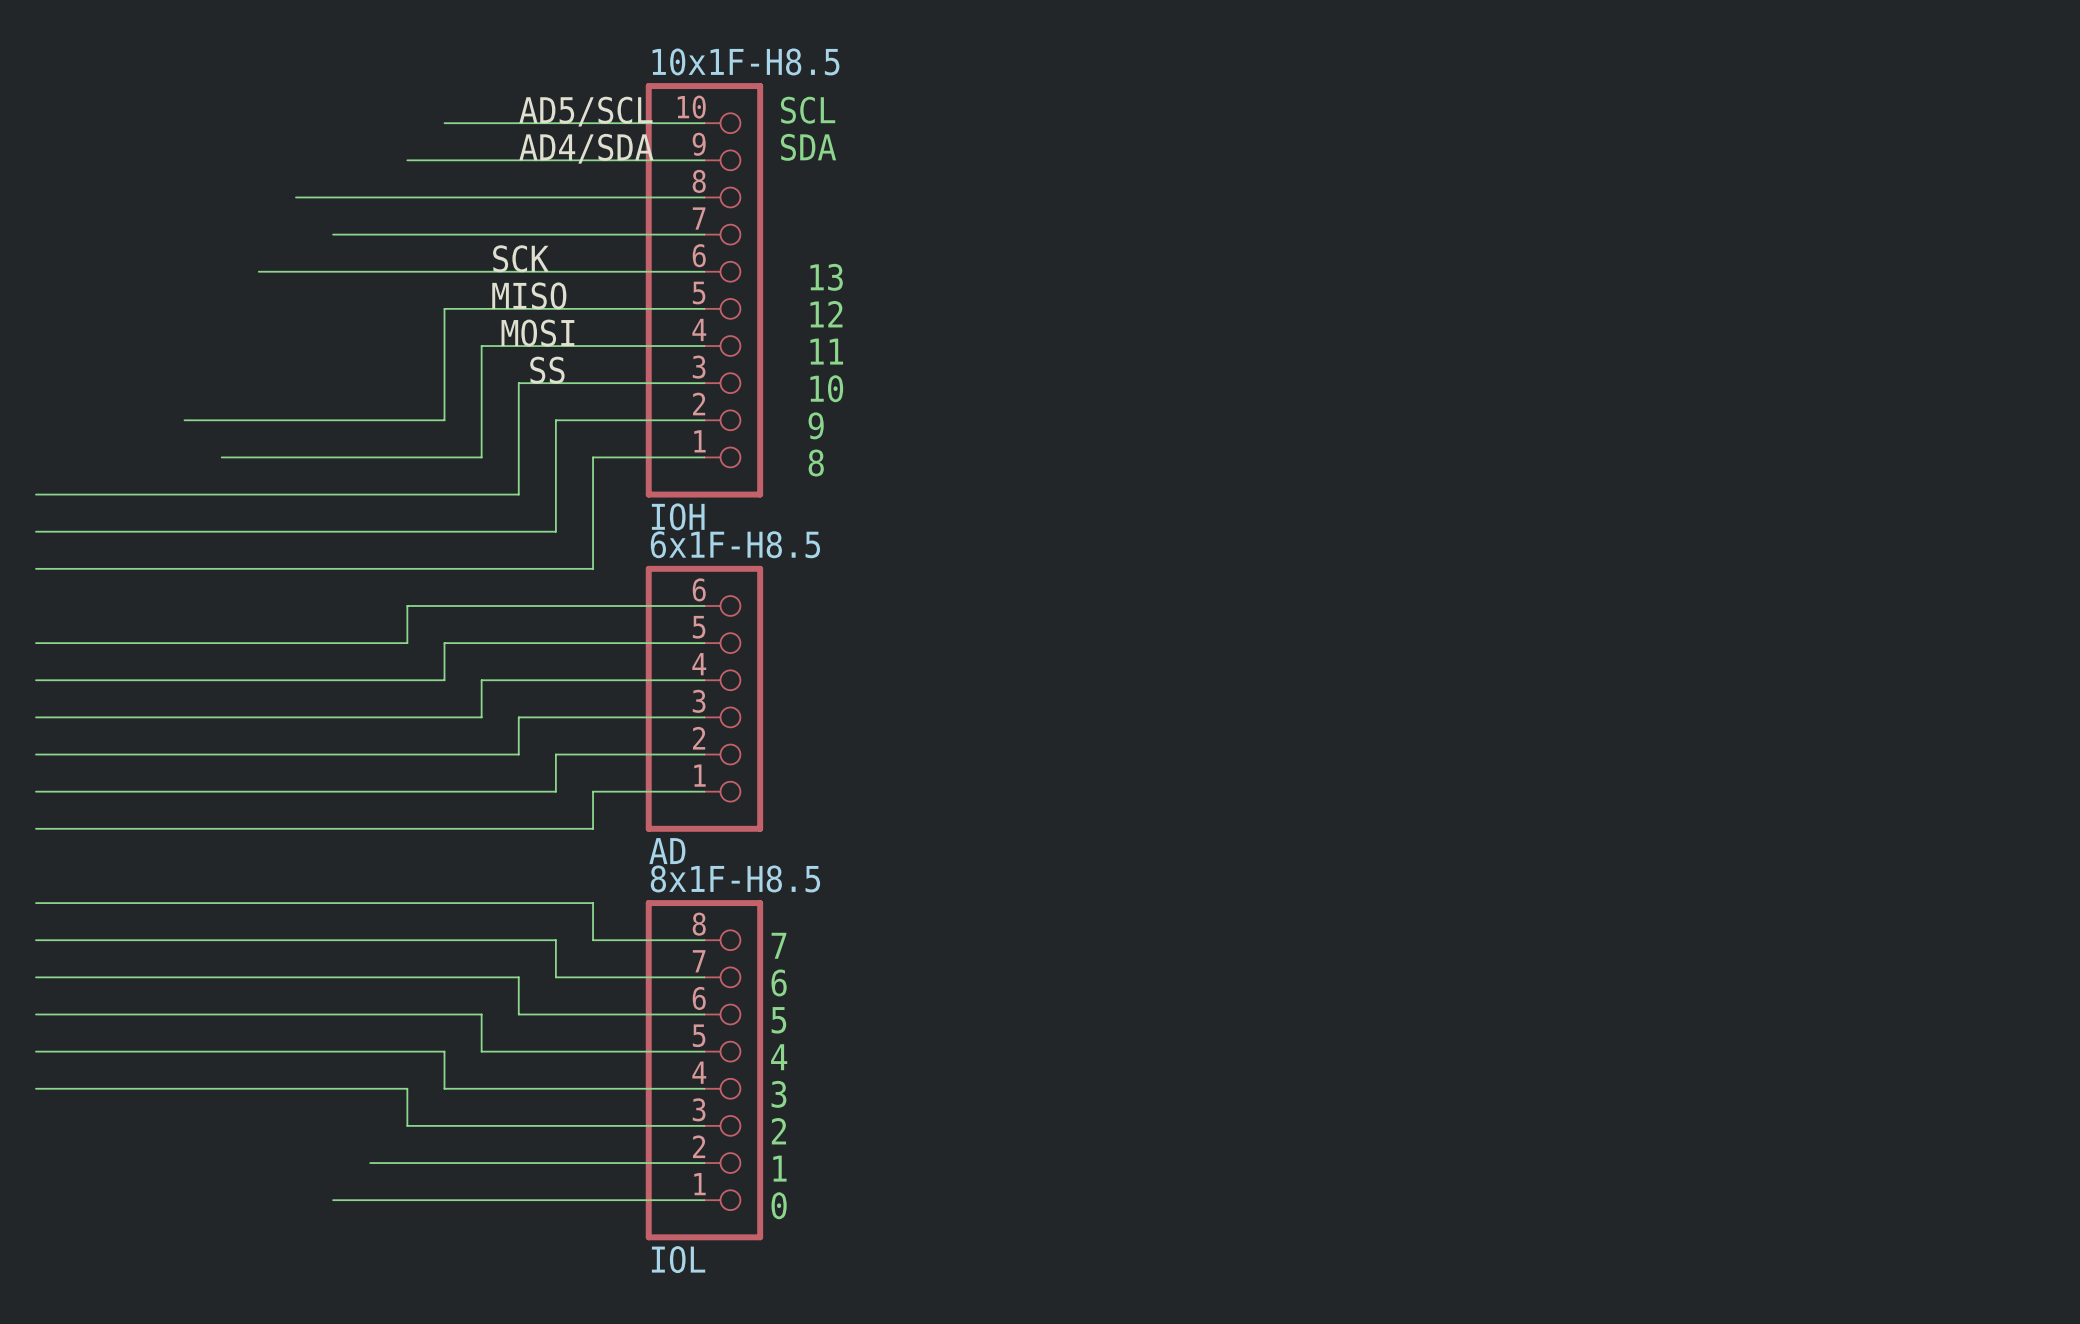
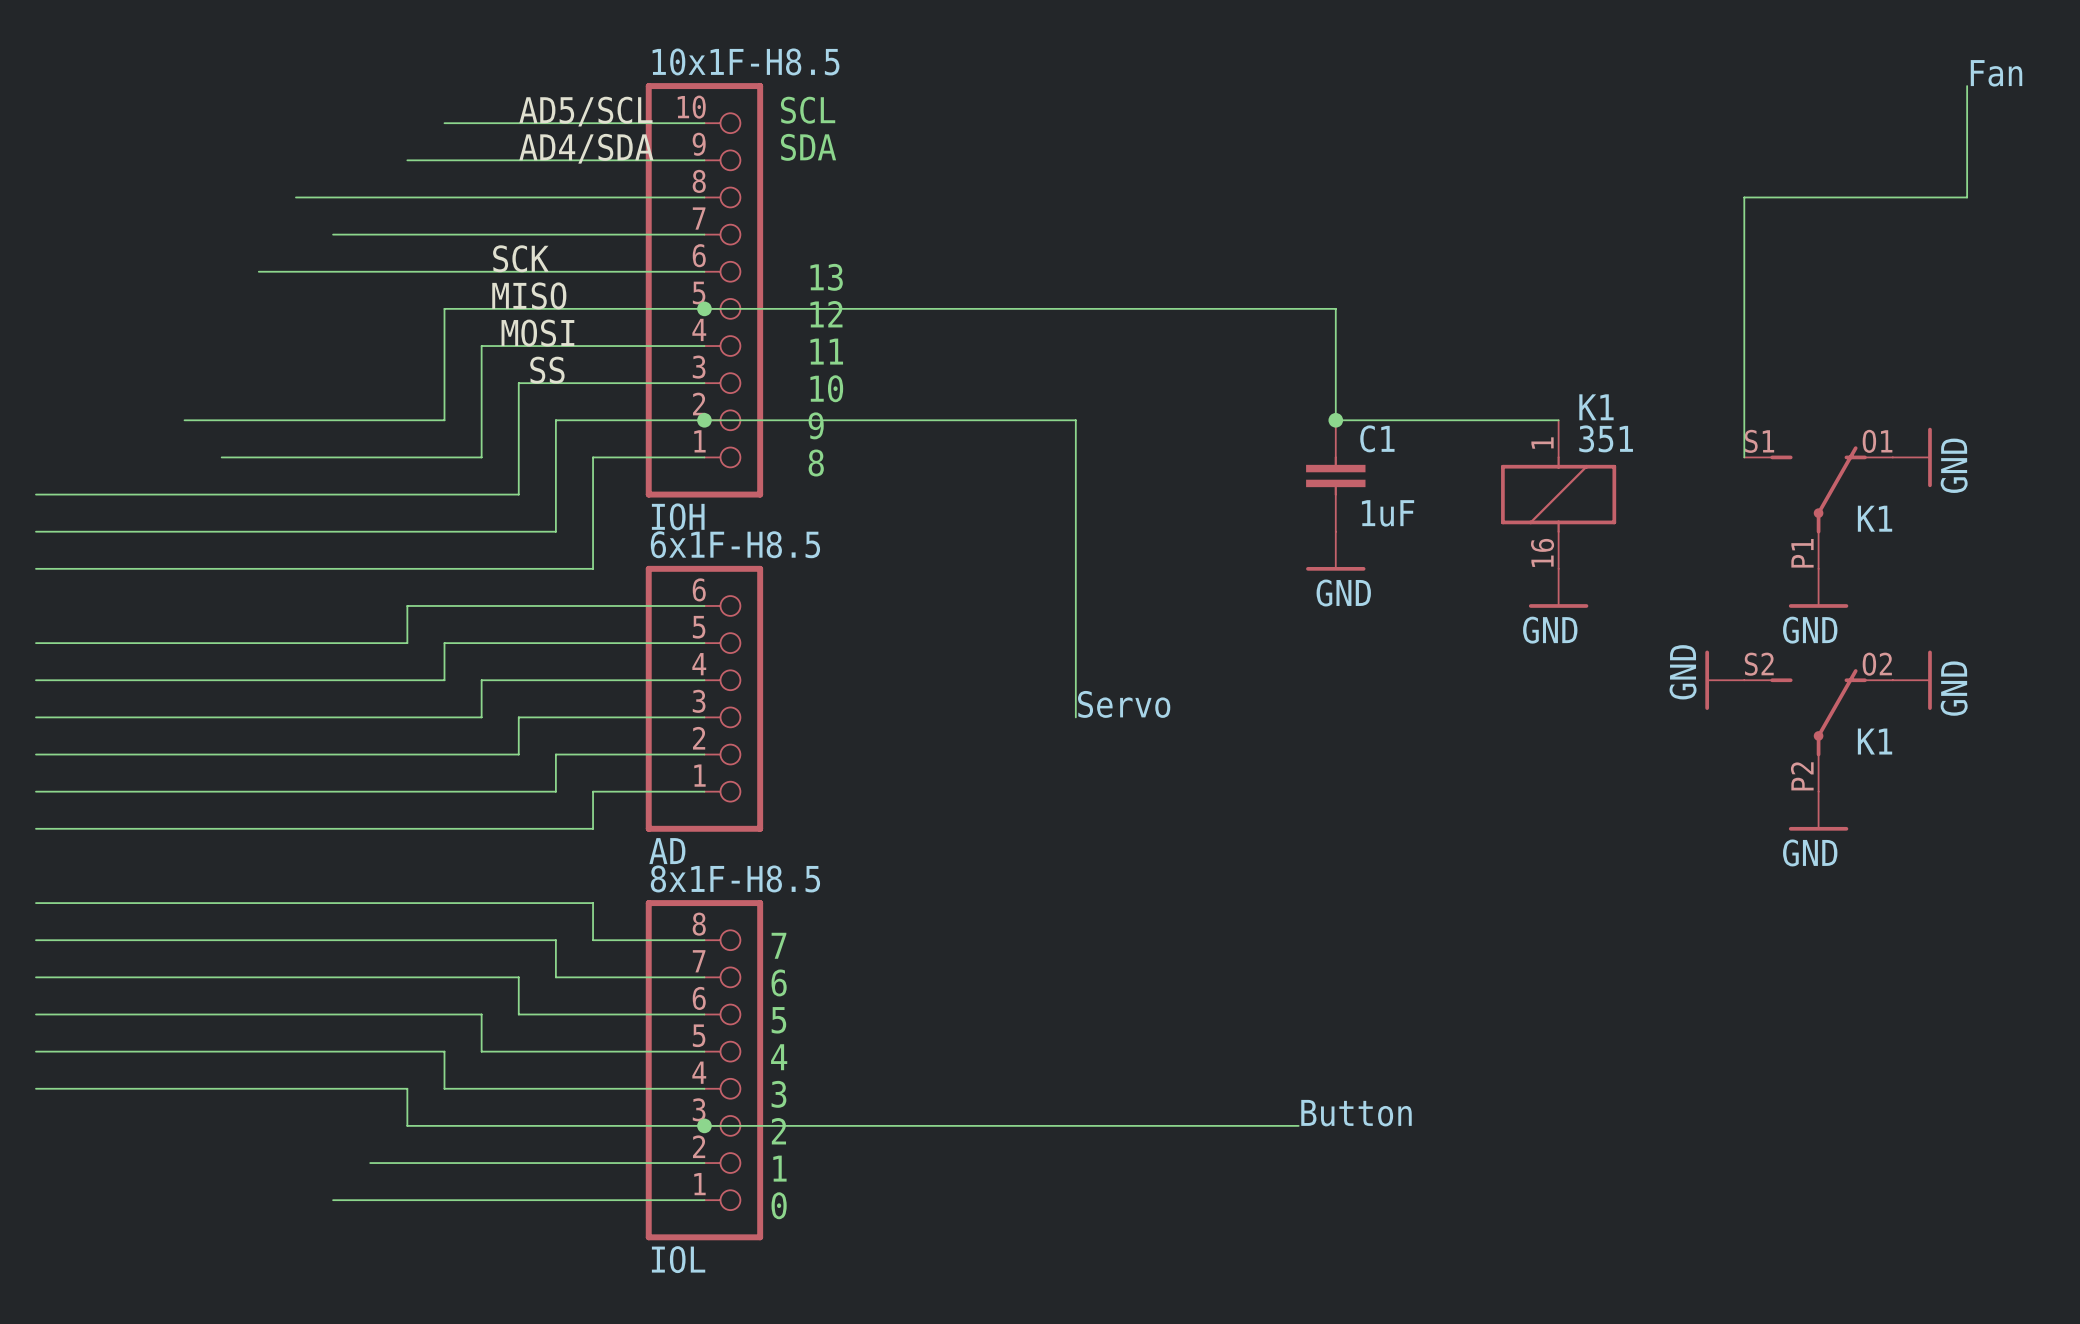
text: none -> Fan (1996, 73)
wire: none -> (1967, 86) (1967, 197) (1744, 197) (1744, 457)
wire: none -> (704, 308) (1335, 308) (1335, 420) (1558, 420)
junction: none -> (704, 308)
wire: none -> (704, 420) (1075, 420) (1075, 717)
junction: none -> (704, 420)
junction: none -> (1335, 420)
power symbol: none -> GND (1912, 457)
C1: none -> 1uF (1335, 476)
K1: none -> 351 (1558, 494)
K1: none -> (1818, 507)
power symbol: none -> GND (1335, 551)
power symbol: none -> GND (1558, 588)
power symbol: none -> GND (1818, 588)
power symbol: none -> GND (1724, 680)
power symbol: none -> GND (1912, 680)
text: none -> Servo (1124, 704)
K1: none -> (1818, 730)
power symbol: none -> GND (1818, 811)
text: none -> Button (1356, 1113)
wire: none -> (704, 1125) (1298, 1125)
junction: none -> (704, 1125)

